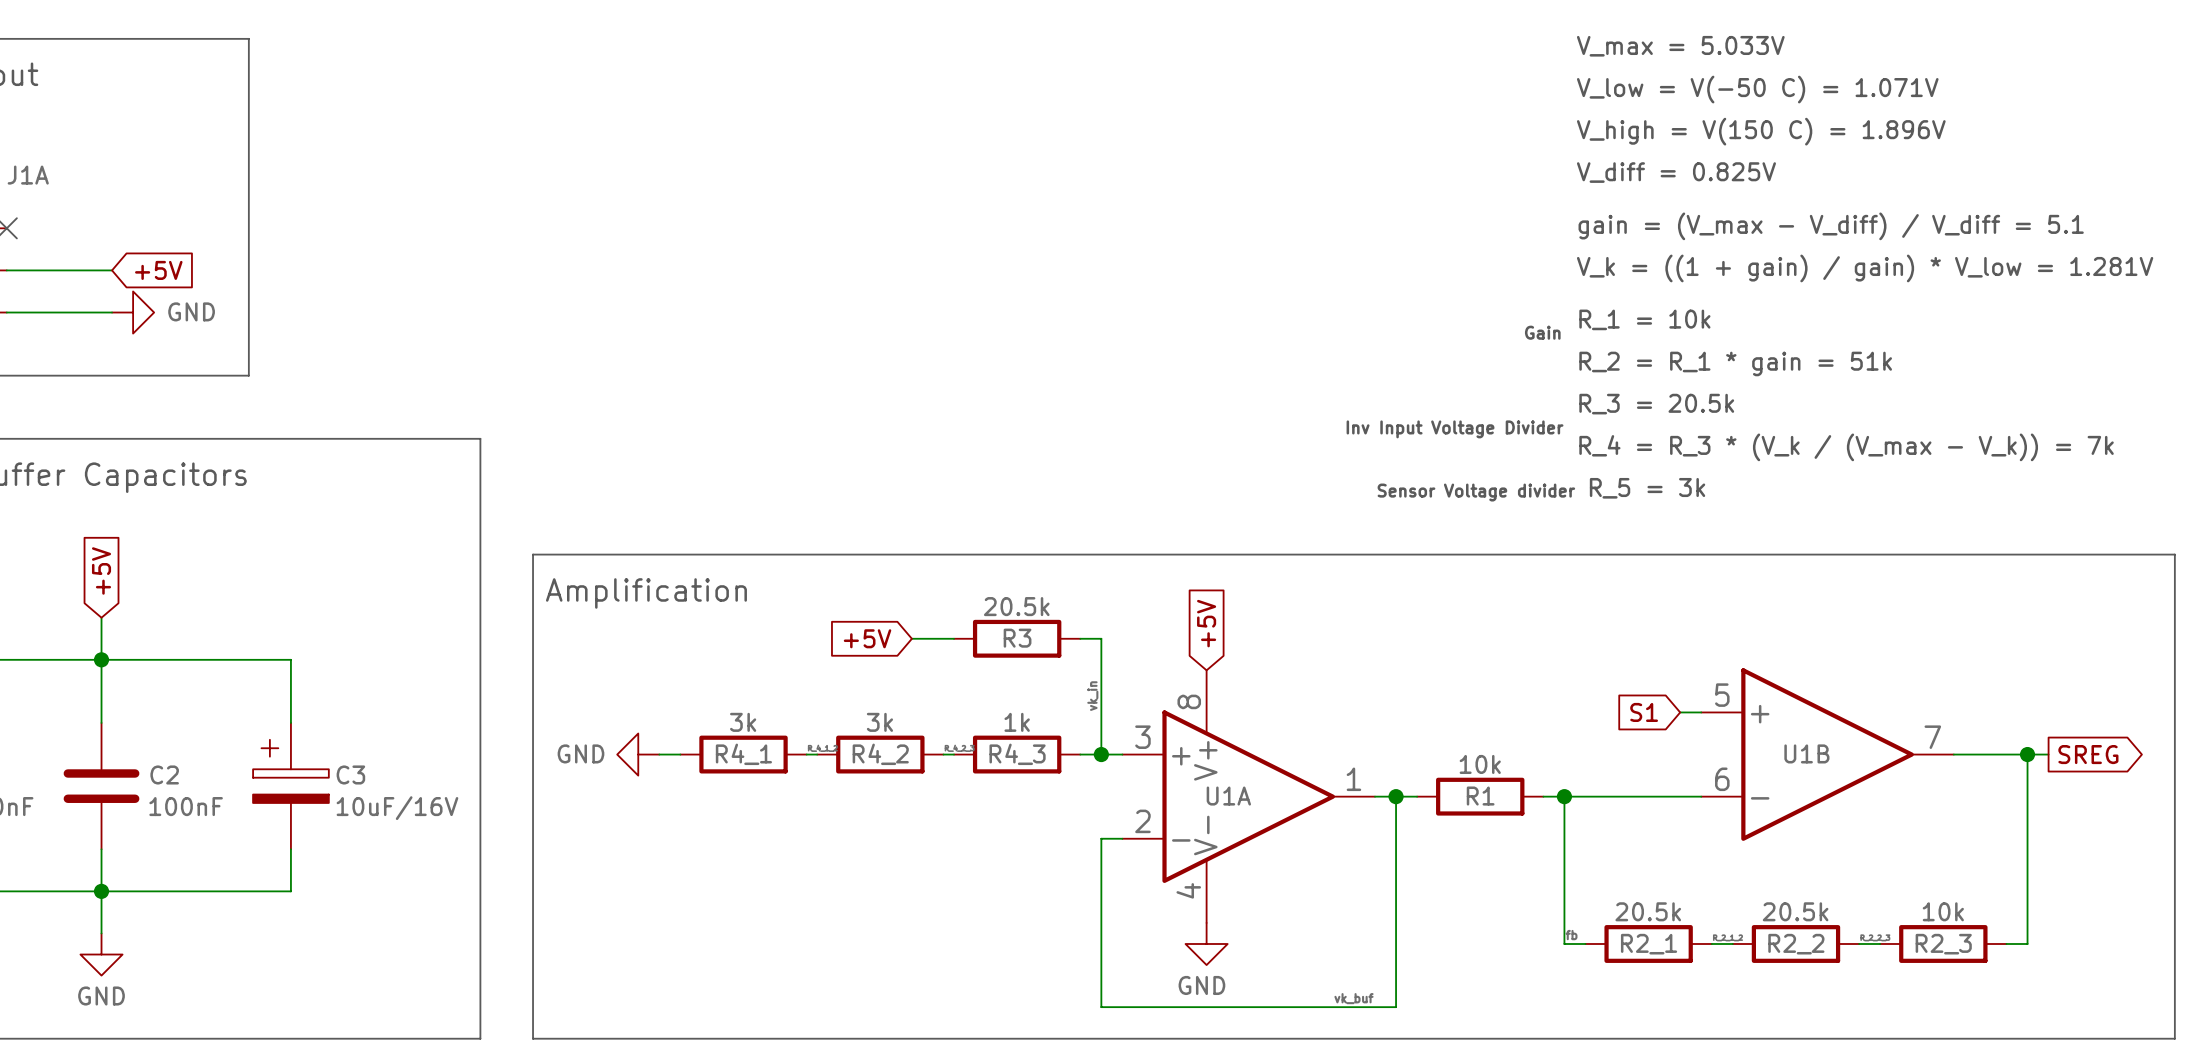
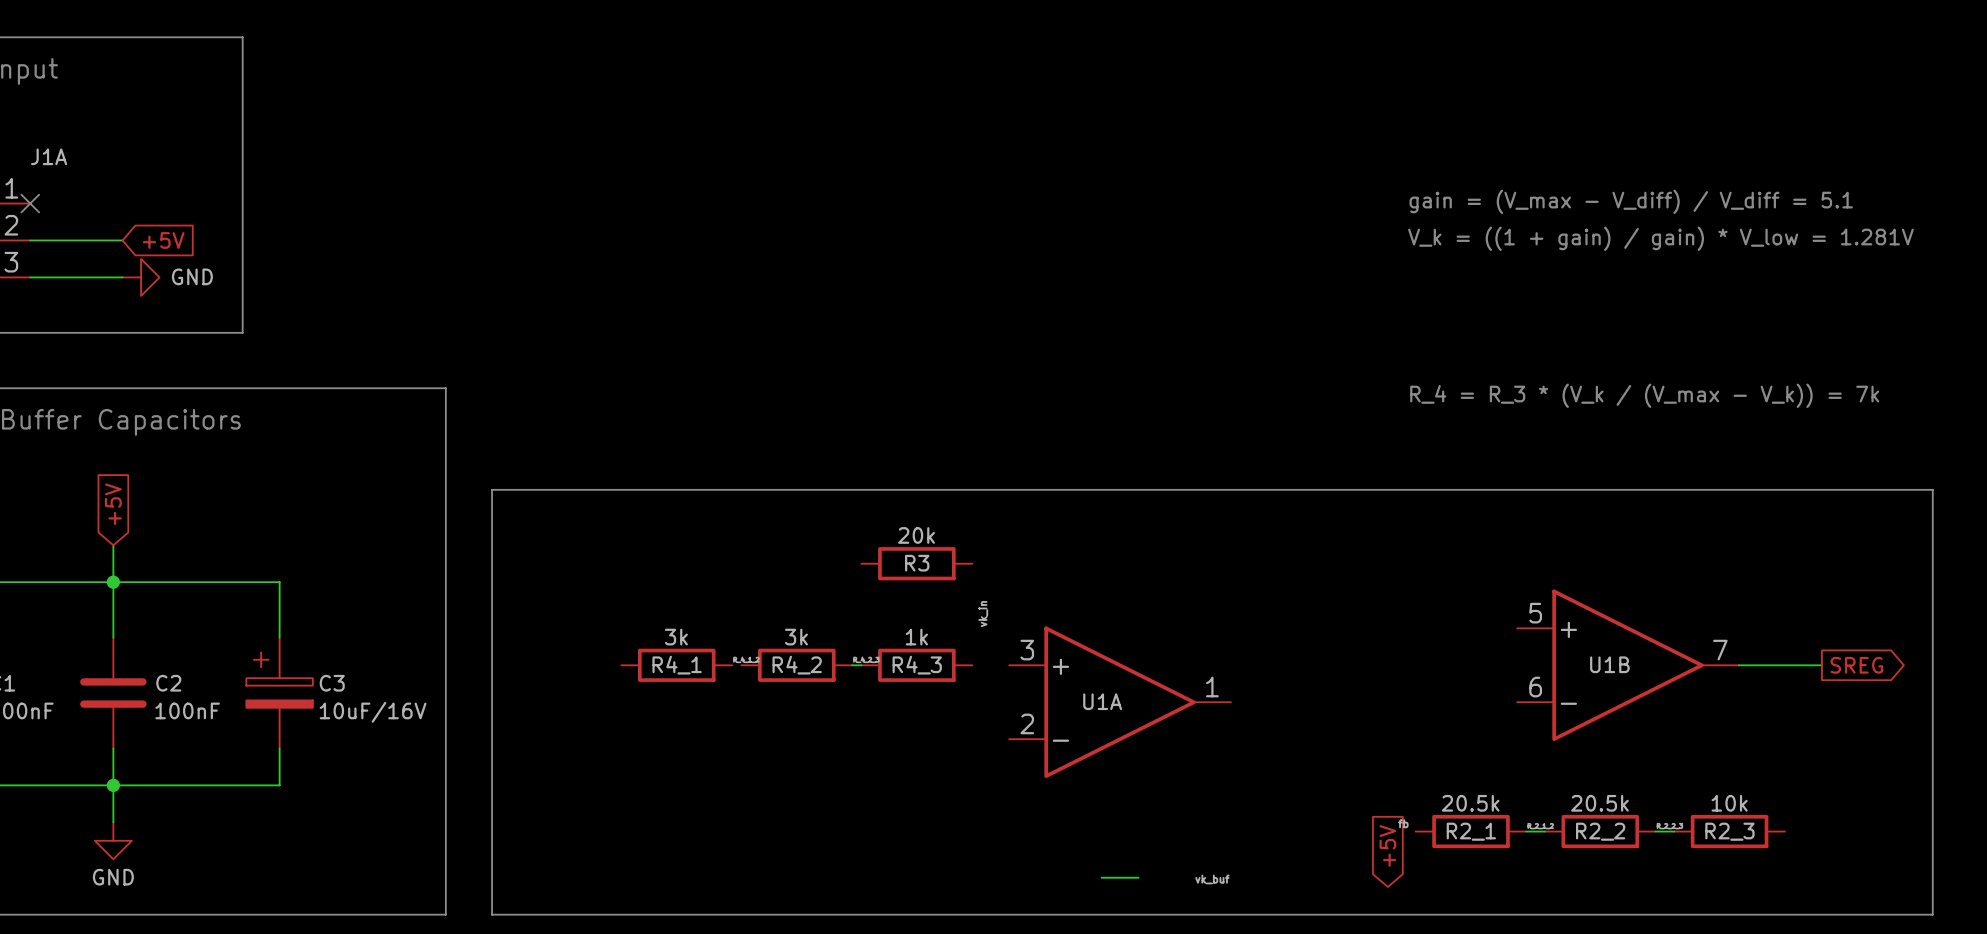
text: V_max = 5.033V (1680, 46) -> none
text: V_low = V(-50 C) = 1.071V (1757, 89) -> none
text: V_high = V(150 C) = 1.896V (1761, 131) -> none
text: V_diff = 0.825V (1676, 172) -> none
text: R_1 = 10k (1644, 319) -> none
text: Gain (1542, 332) -> none
text: R_2 = R_1 * gain = 51k (1735, 363) -> none
text: R_3 = 20.5k (1656, 404) -> none
text: Inv Input Voltage Divider (1455, 429) -> none
text: R_5 = 3k (1647, 488) -> none
text: Sensor Voltage divider (1476, 492) -> none
text: Amplification (646, 593) -> none
R3 value: 20.5k (1016, 606) -> 20k (916, 535)
global label: +5V (1206, 623) -> none
global label: +5V (867, 638) -> none
wire: (911, 638) (954, 638) -> none
wire: (1080, 638) (1101, 638) (1101, 754) -> none
global label: S1 (1644, 712) -> none
wire: (1680, 712) (1701, 712) -> none
power symbol: GND (638, 754) -> none
wire: (659, 754) (680, 754) -> none
wire: (806, 754) (817, 754) -> none
wire: (1080, 754) (1122, 754) -> none
junction: (1101, 754) -> none
wire: (2027, 754) (2027, 943) (2006, 943) -> none
junction: (2027, 754) -> none
part: (1206, 796) -> none
wire: (1374, 796) (1417, 796) -> (1101, 877) (1138, 877)
wire: (1396, 796) (1396, 1007) (1101, 1007) (1101, 838) (1122, 838) -> none
junction: (1396, 796) -> none
R1: 10k (1480, 796) -> none
wire: (1543, 796) (1701, 796) -> none
wire: (1564, 796) (1564, 943) (1585, 943) -> none
junction: (1564, 796) -> none
power symbol: GND (1206, 943) -> none
global label: none -> +5V (1387, 845)

